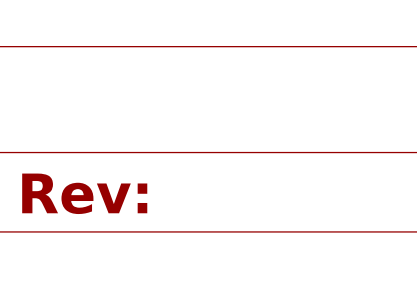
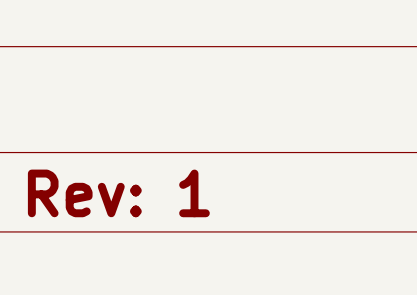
title block: Rev: (84, 193) -> Rev: 1 (118, 193)

